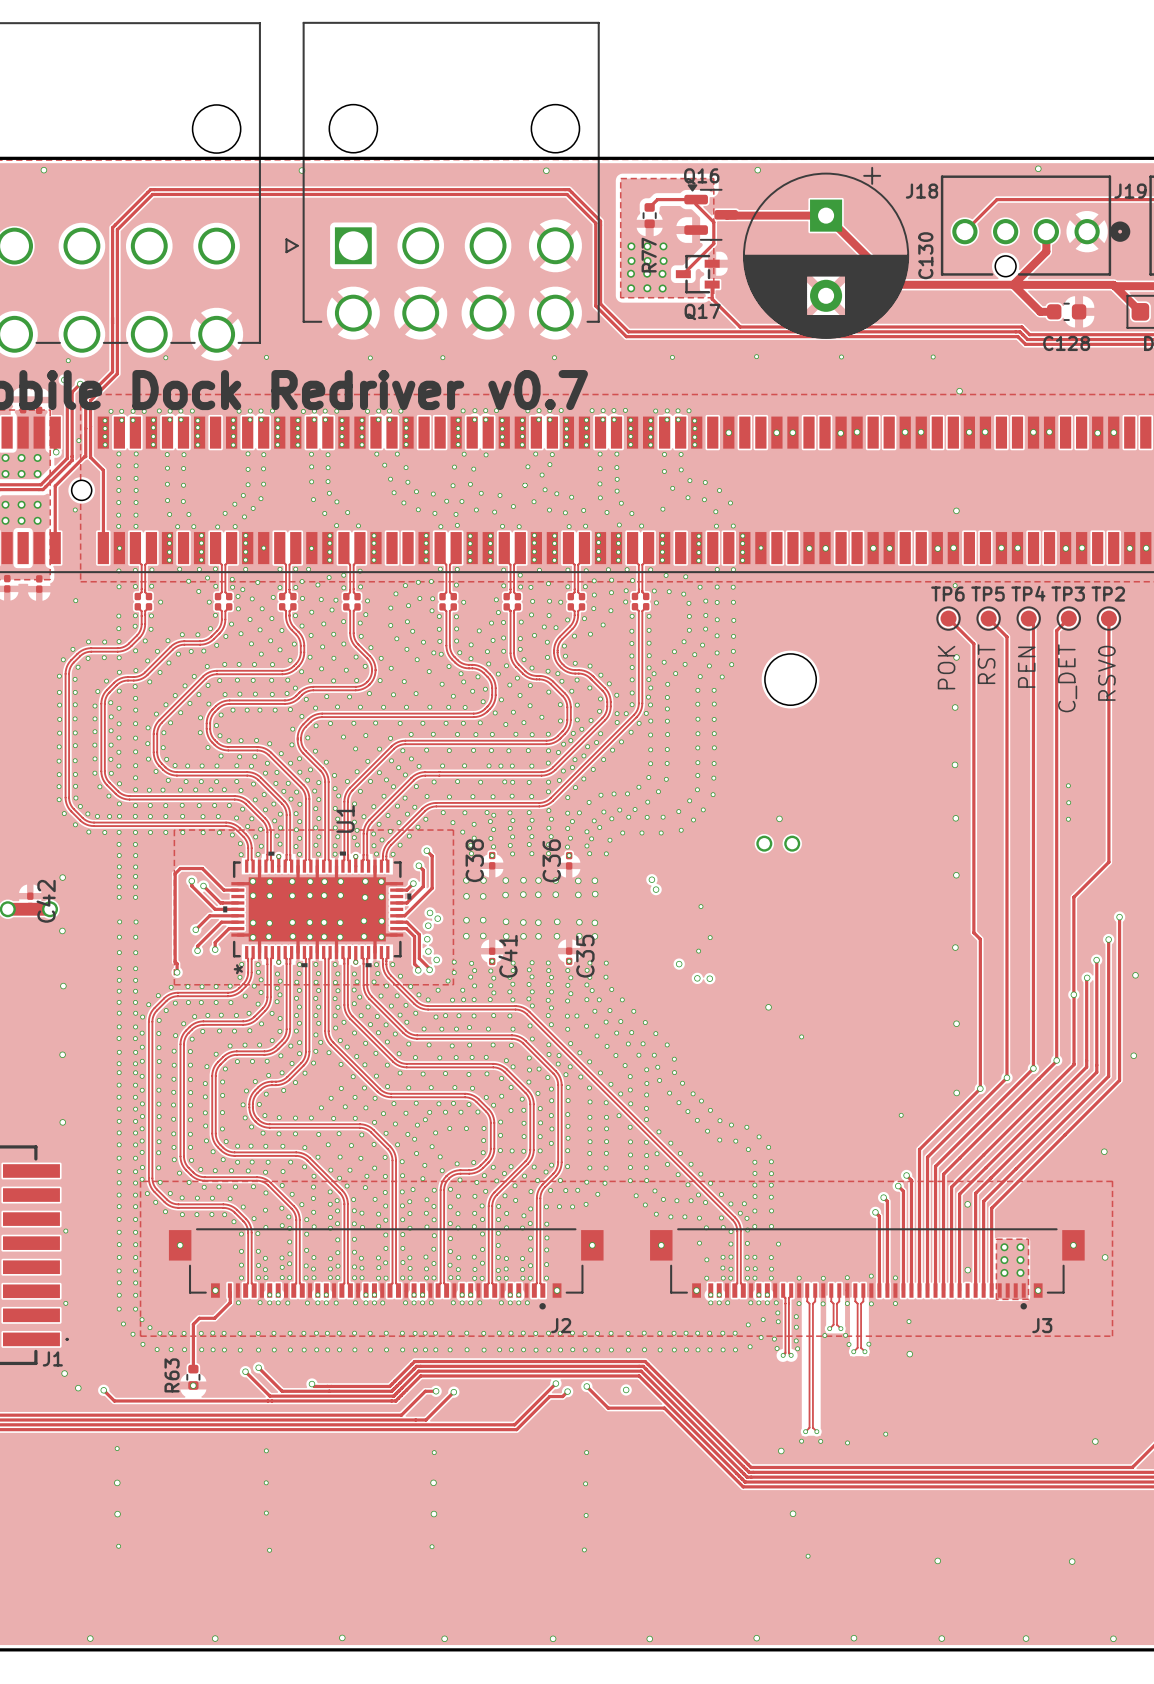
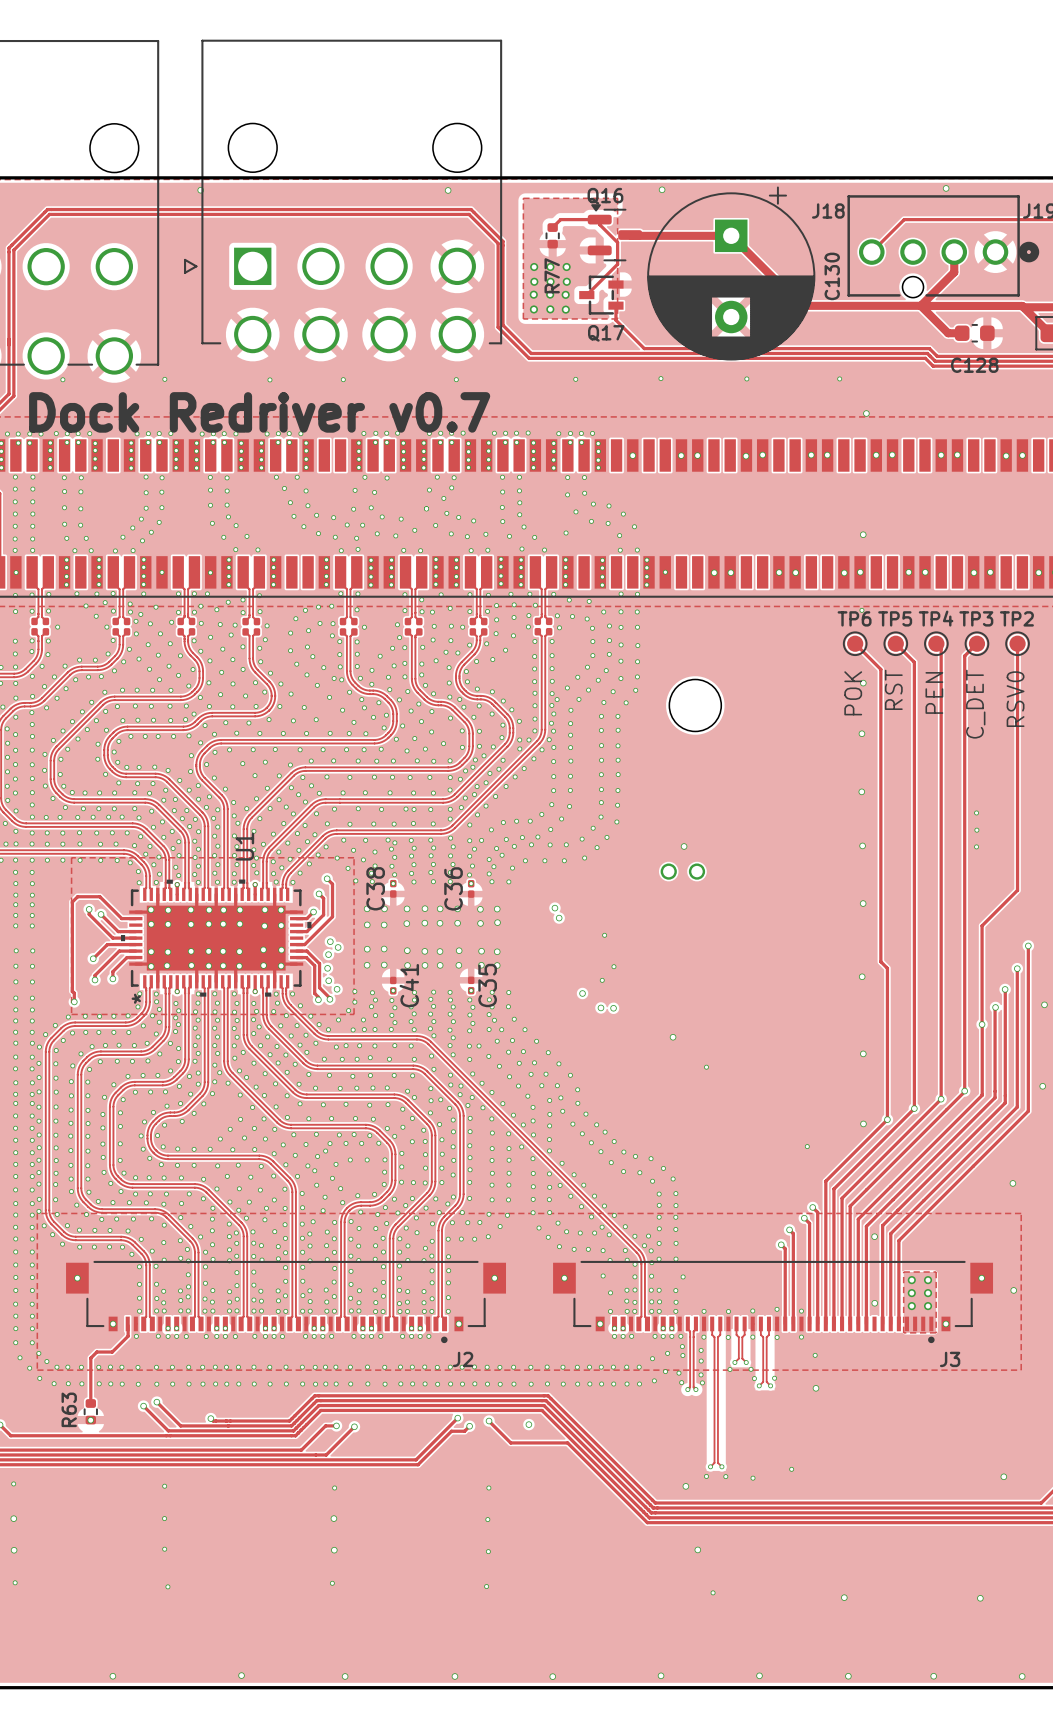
via: (500, 766) -> none
via: none -> (337, 858)
via: (277, 835) -> none
via: none -> (175, 867)
via: none -> (348, 868)
via: (280, 844) -> none
via: none -> (178, 875)
via: none -> (355, 880)

